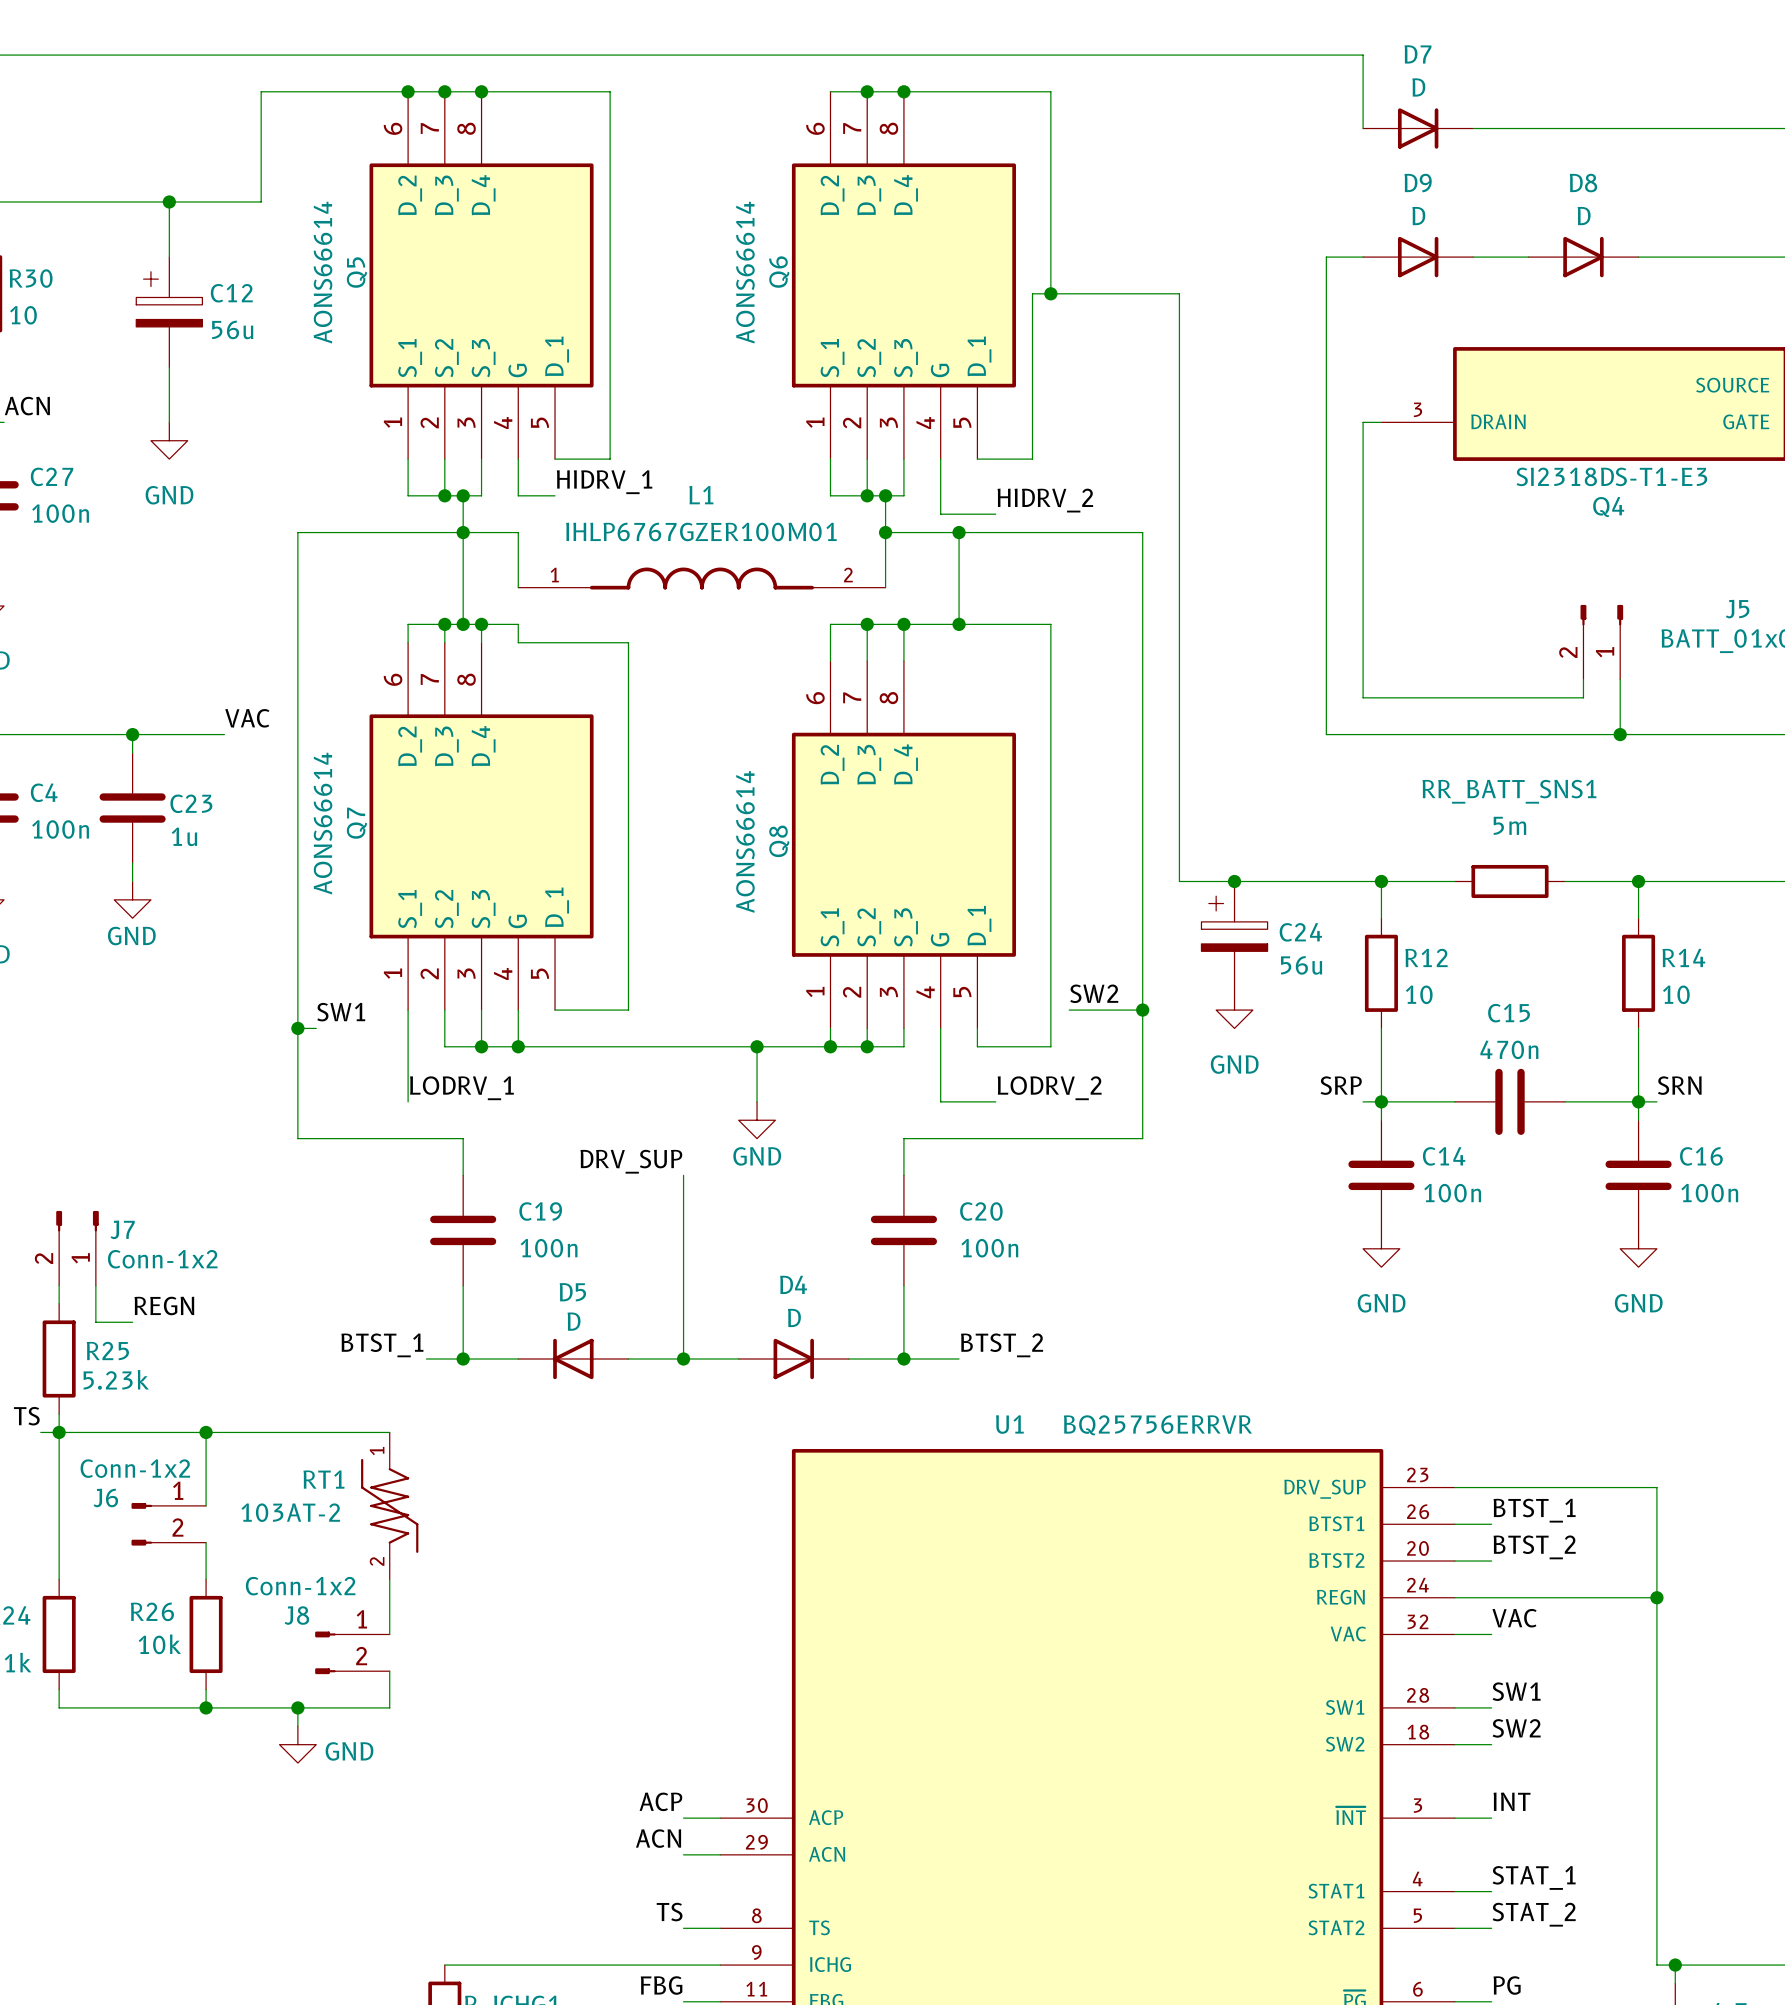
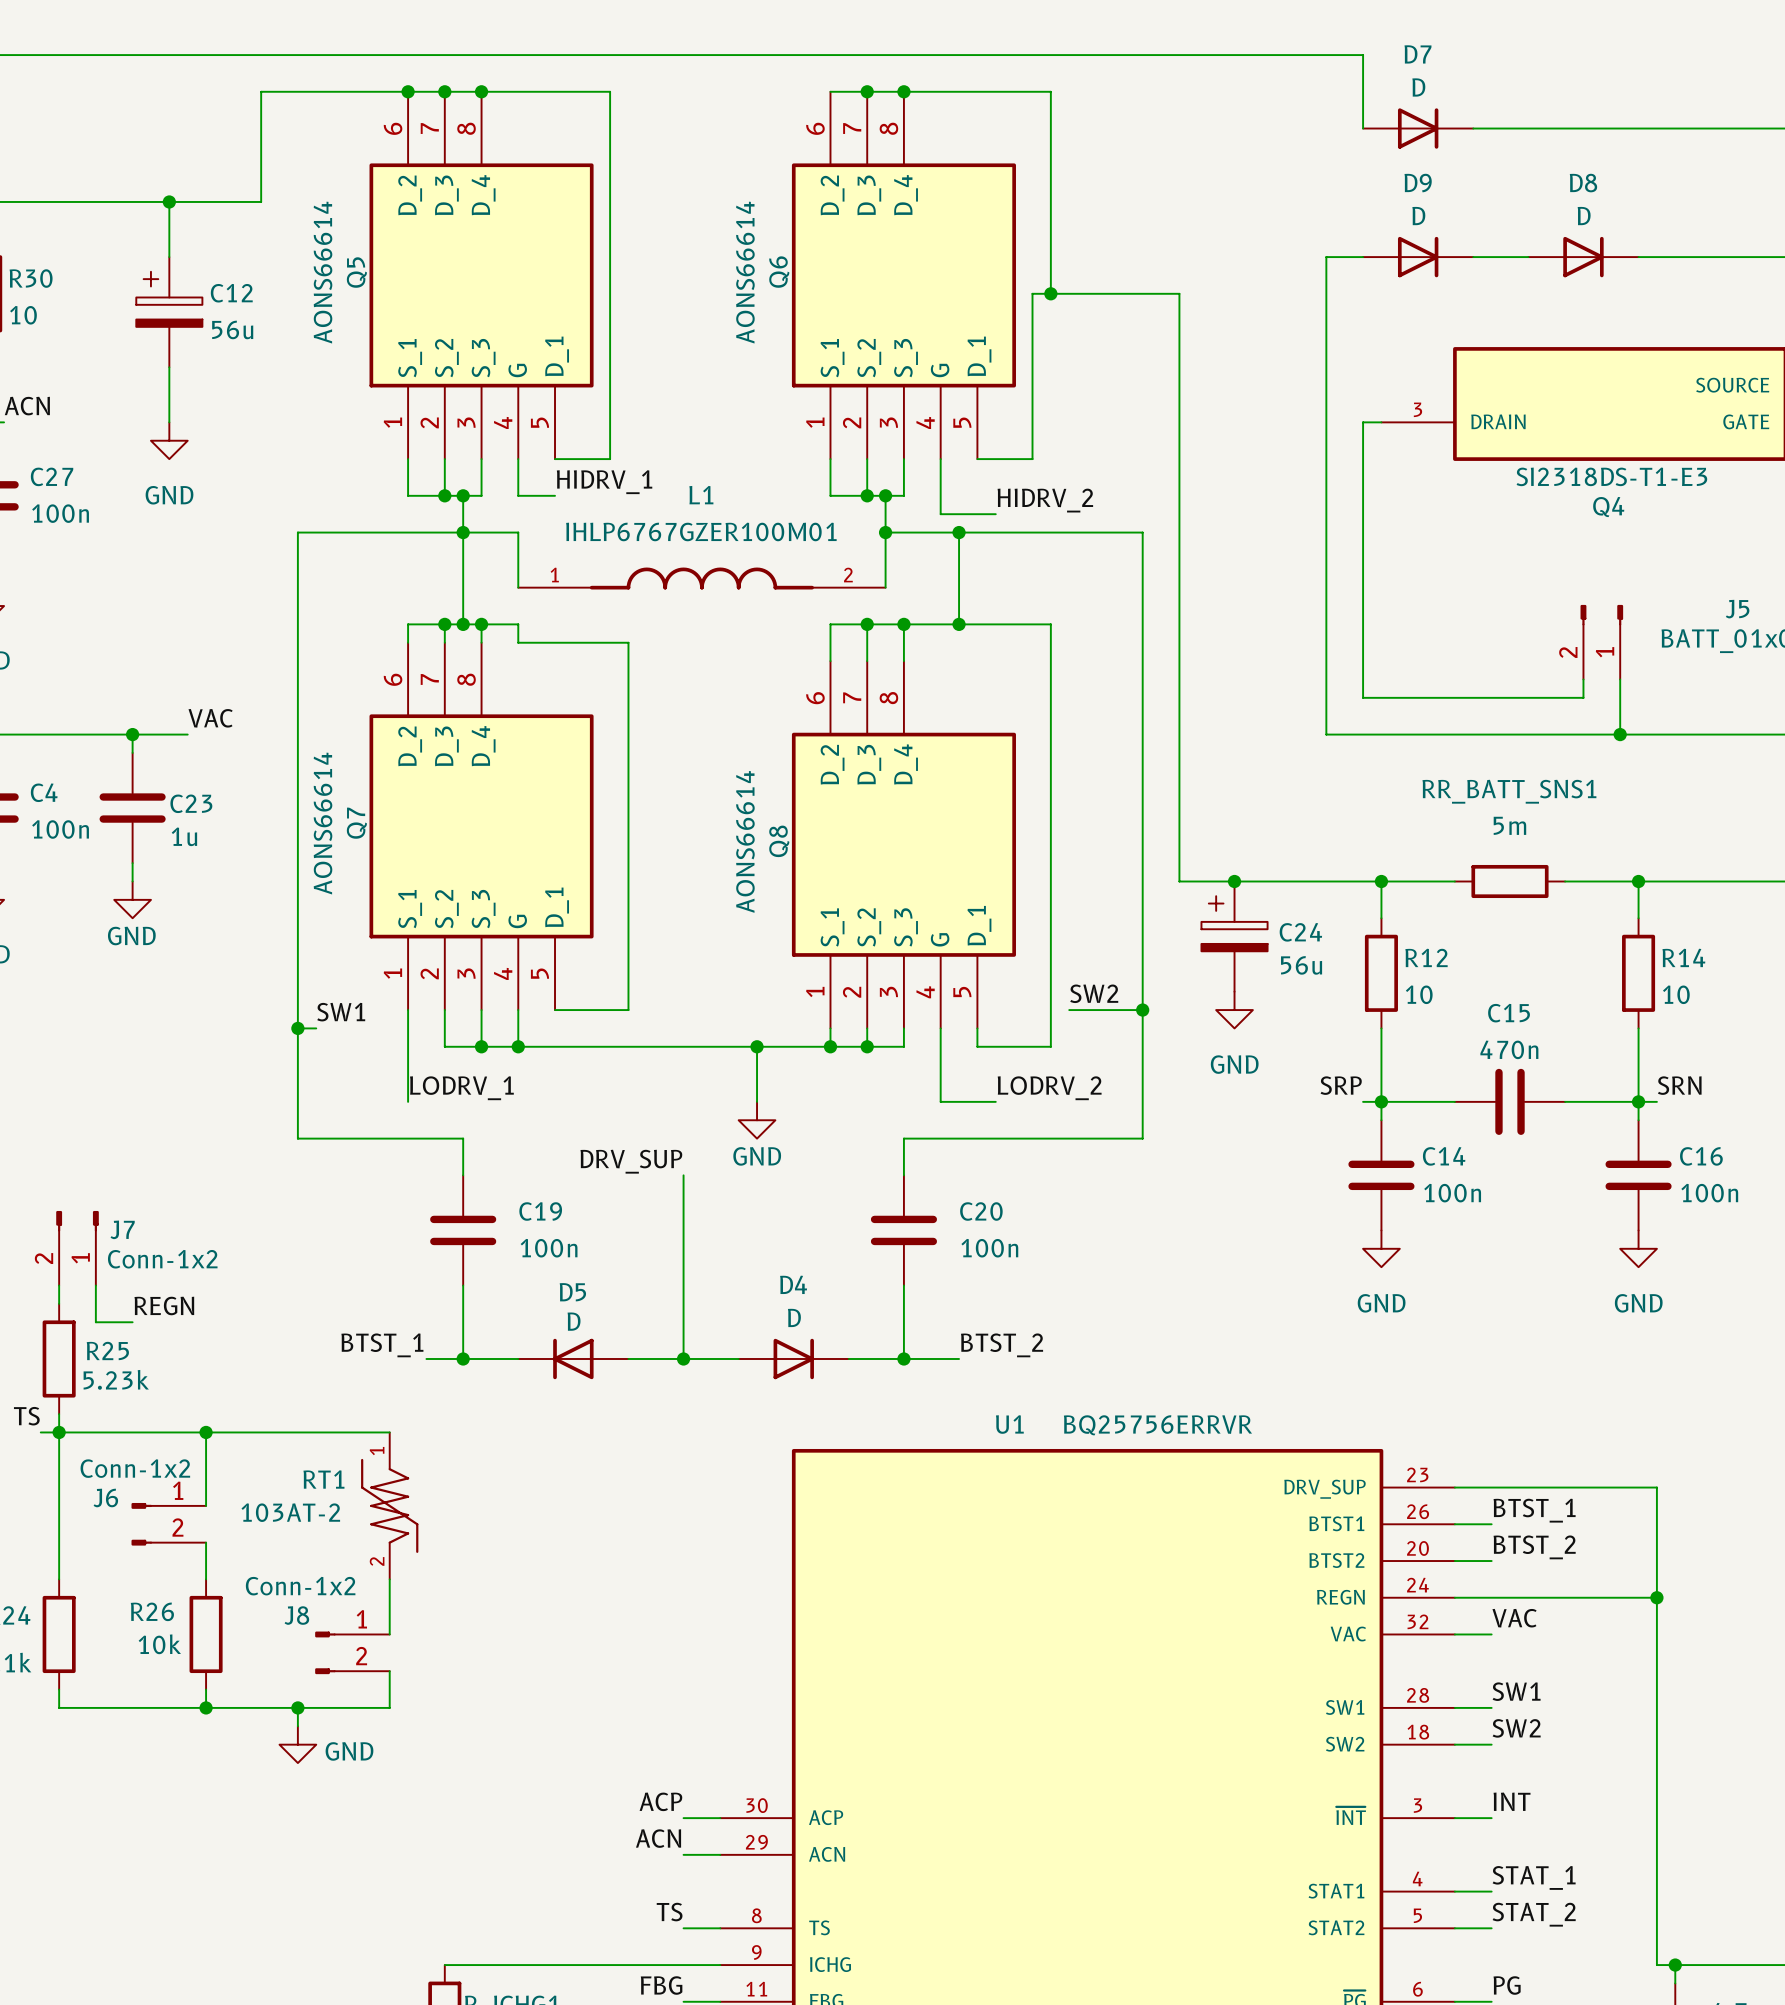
label position: VAC (247, 718) -> VAC (210, 718)
wire: (187, 734) (224, 734) -> none

